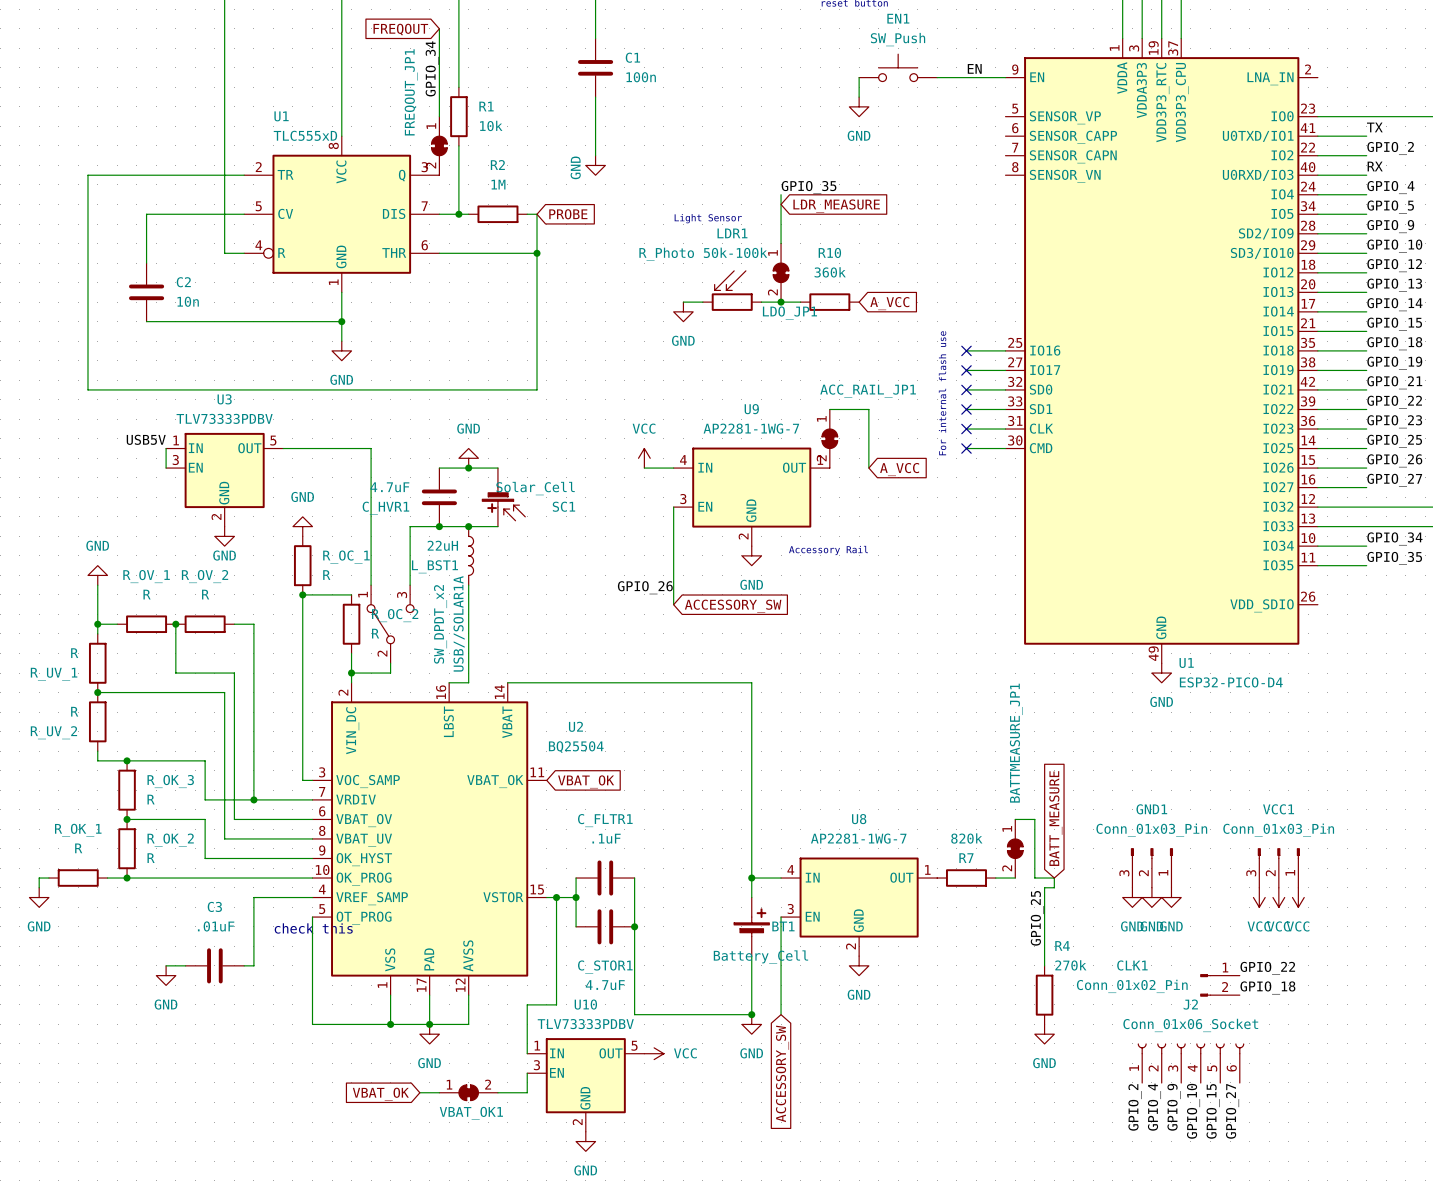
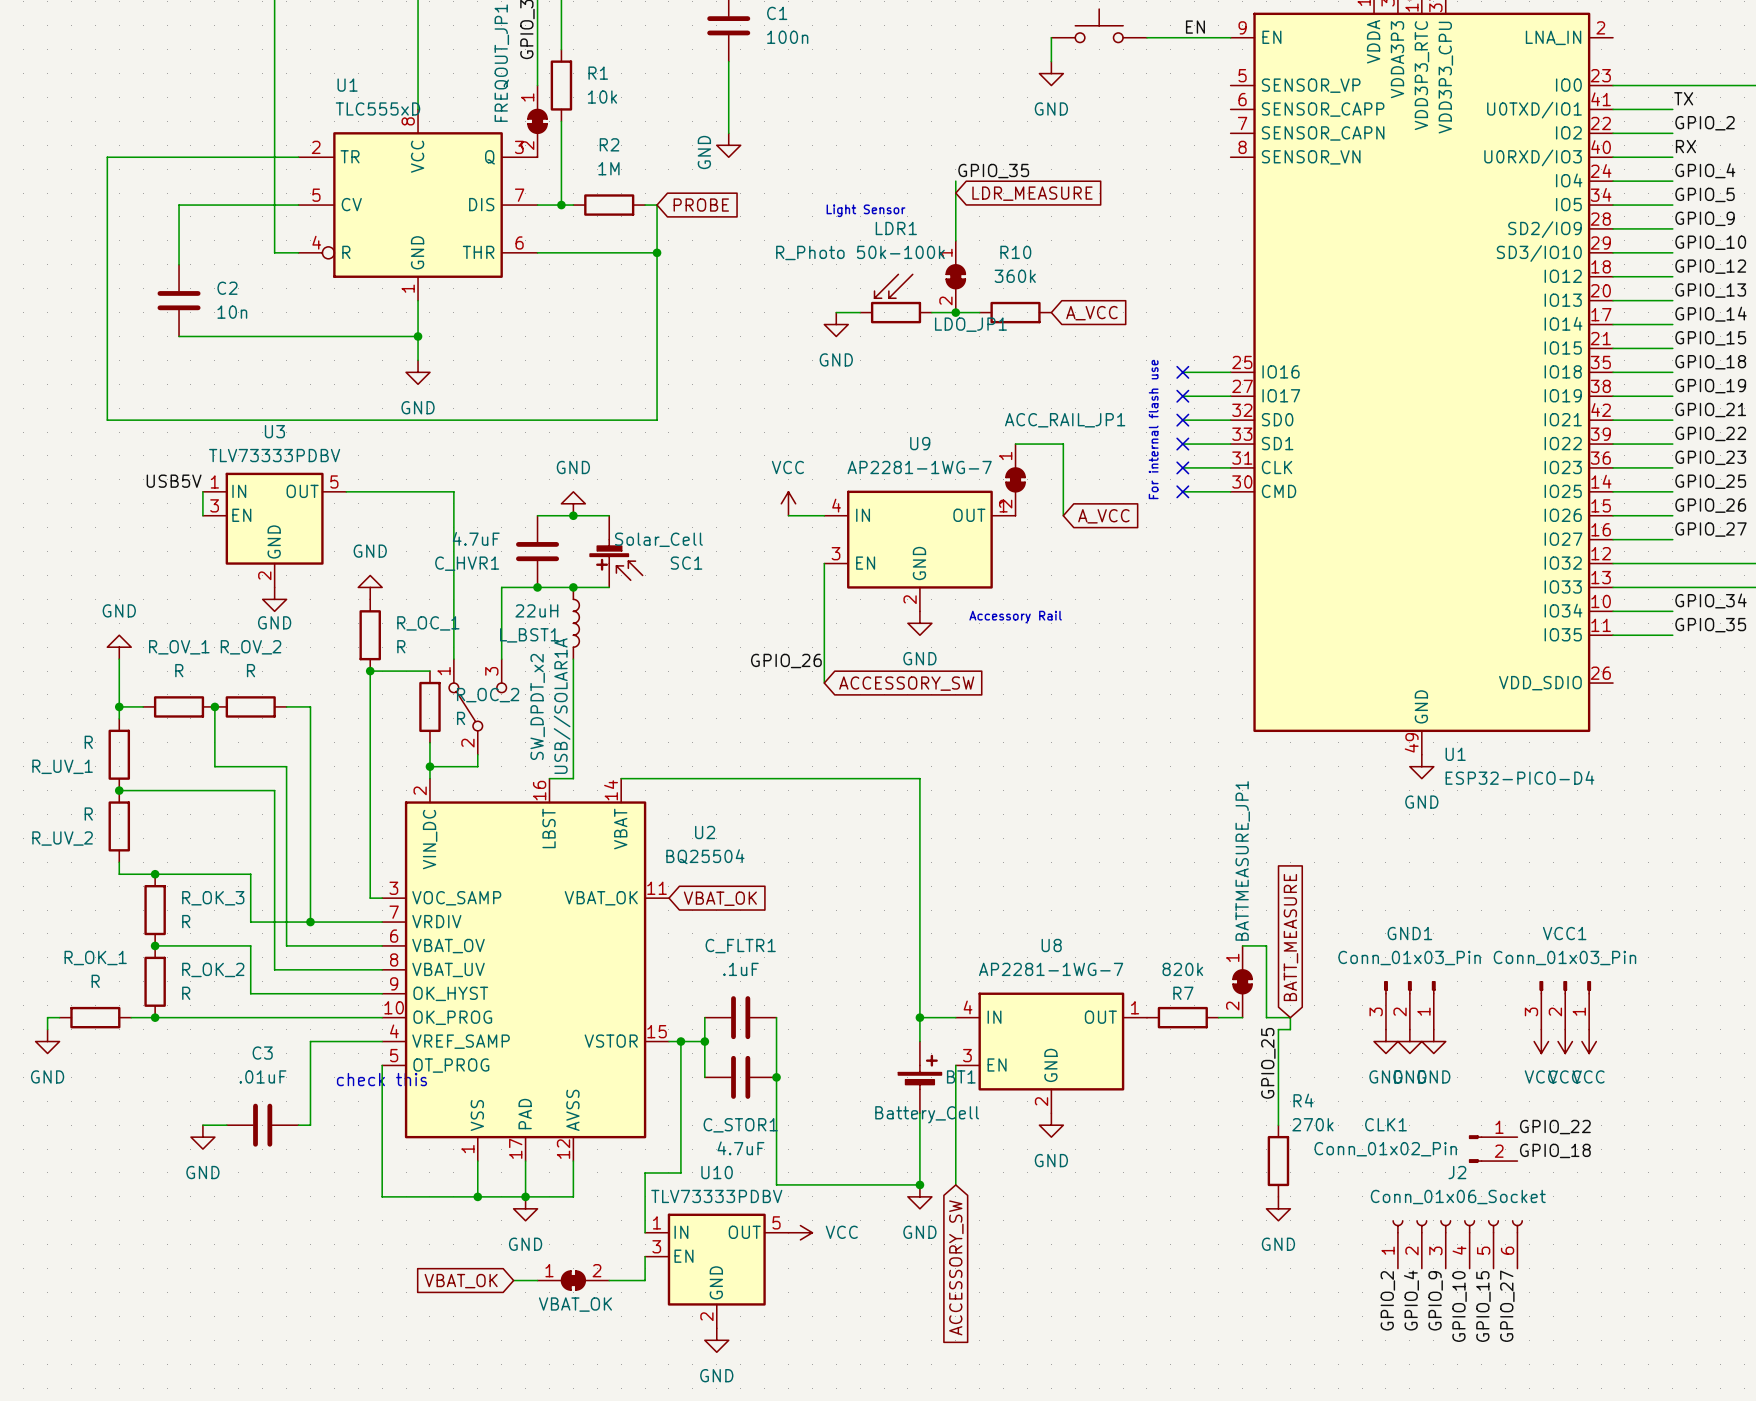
VBAT_OK1 name: VBAT_OK1 (471, 1113) -> VBAT_OK (575, 1304)

